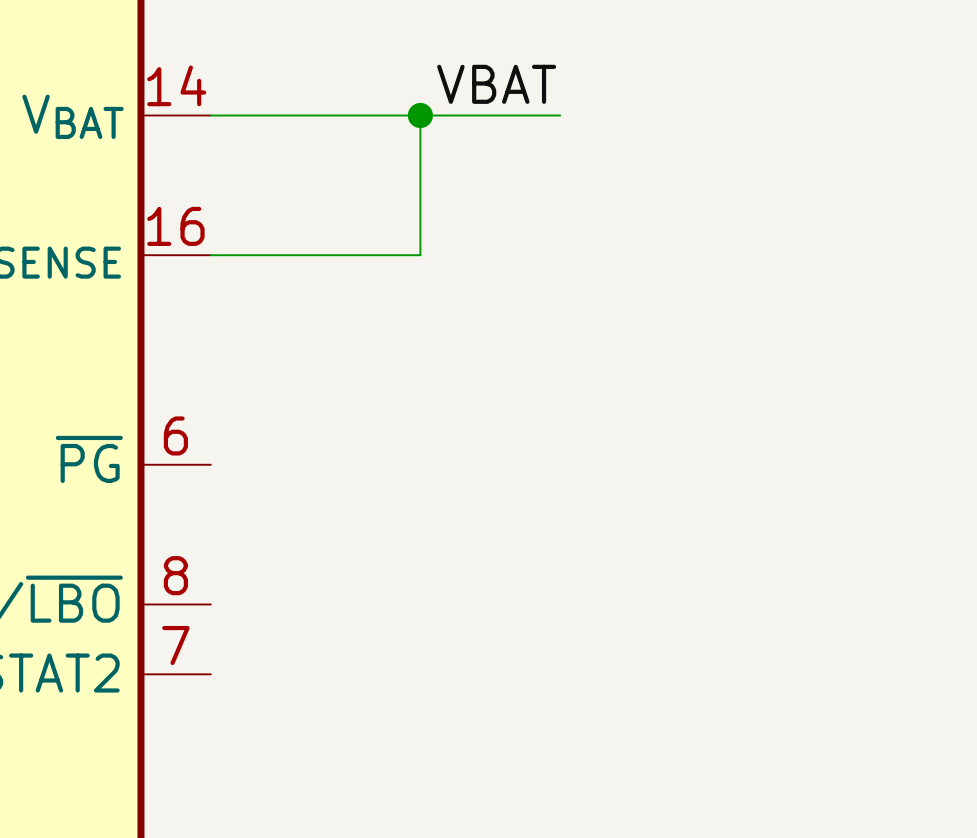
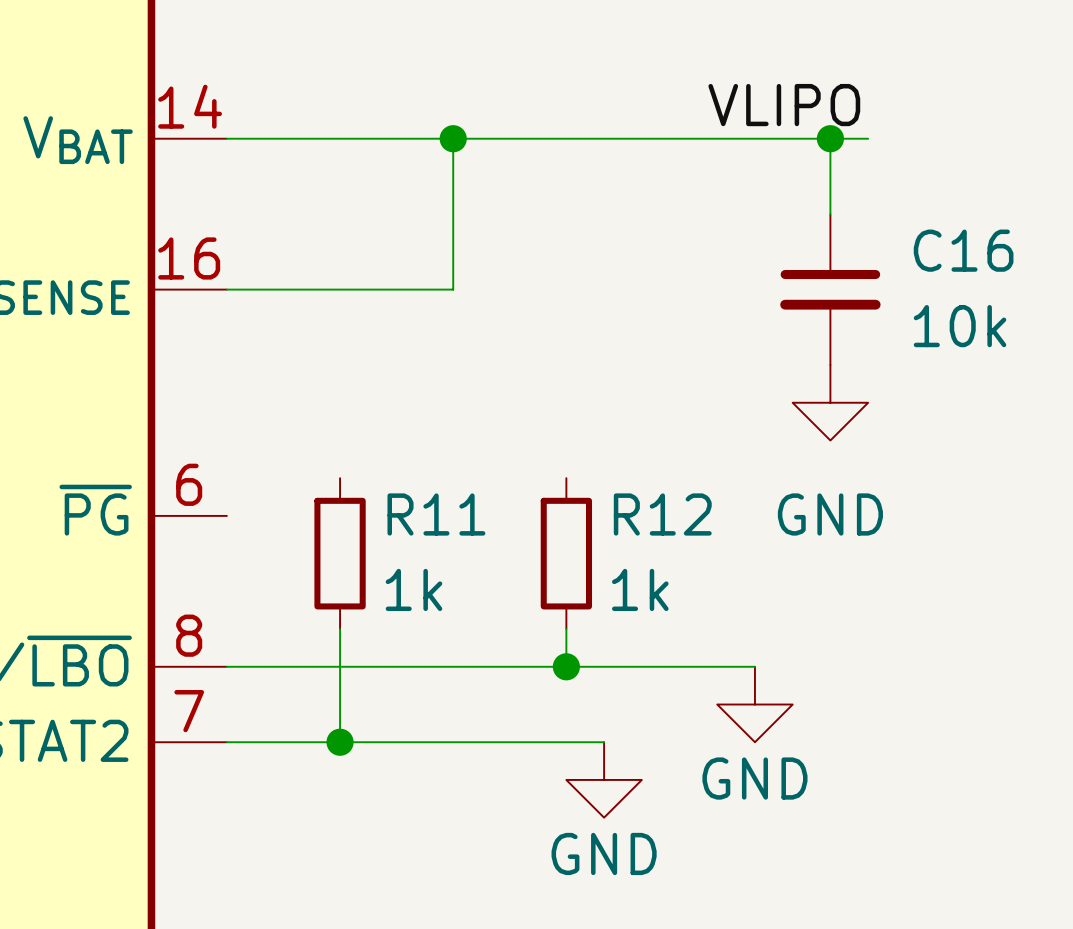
label: VBAT (496, 84) -> none
label: none -> VLIPO (784, 105)
wire: none -> (604, 138) (868, 138)
wire: none -> (830, 138) (830, 214)
junction: none -> (830, 138)
C16: none -> 10k (830, 289)
power symbol: none -> GND (830, 402)
R11: none -> 1k (340, 553)
R12: none -> 1k (566, 553)
wire: none -> (340, 629) (340, 742)
wire: none -> (566, 629) (566, 666)
wire: none -> (226, 666) (754, 666)
junction: none -> (566, 666)
power symbol: none -> GND (754, 704)
wire: none -> (226, 742) (604, 742)
junction: none -> (340, 742)
power symbol: none -> GND (604, 779)

